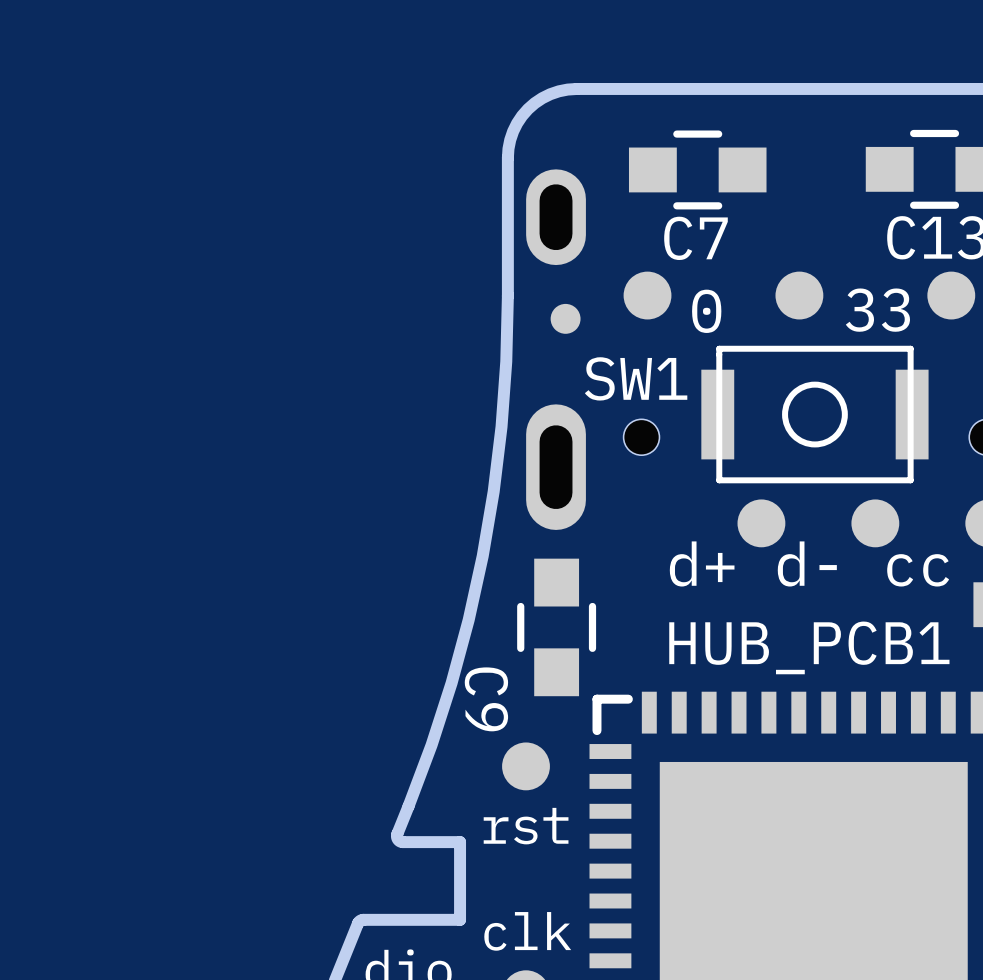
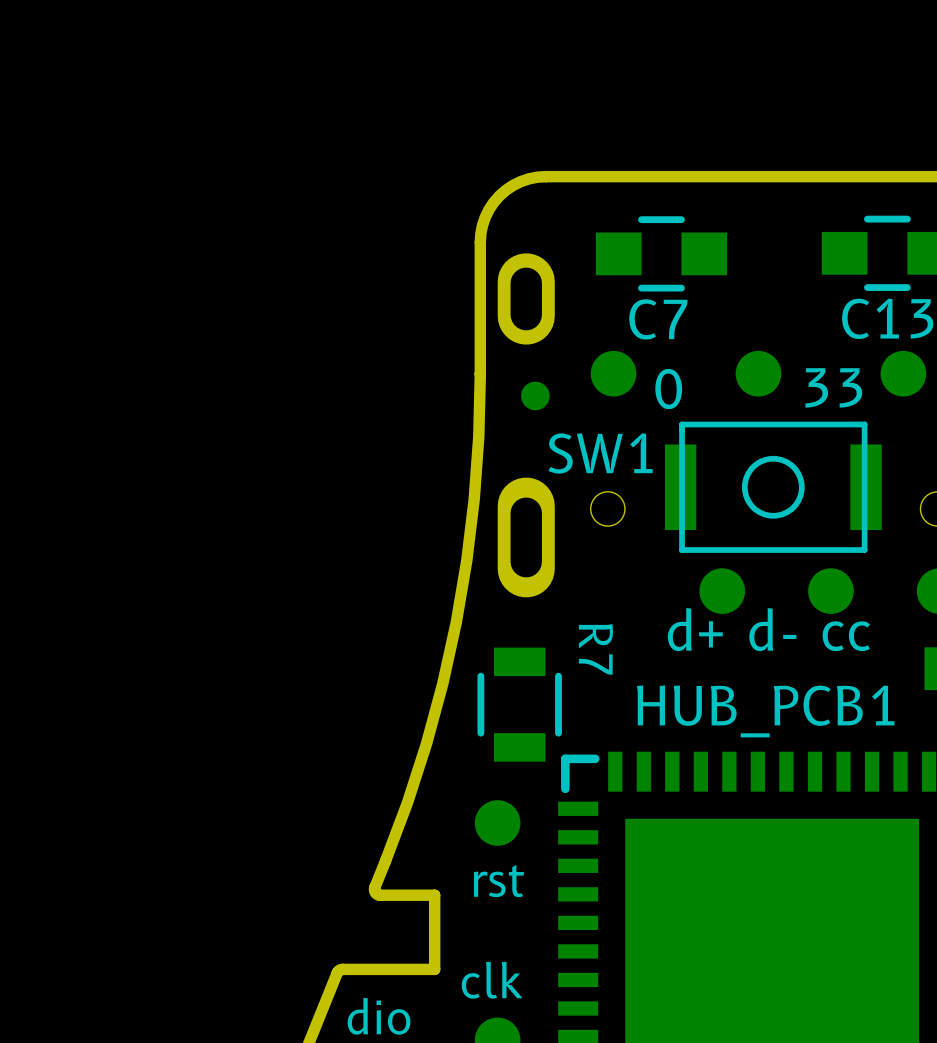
C9: (556, 627) -> none
R7: none -> (519, 704)

